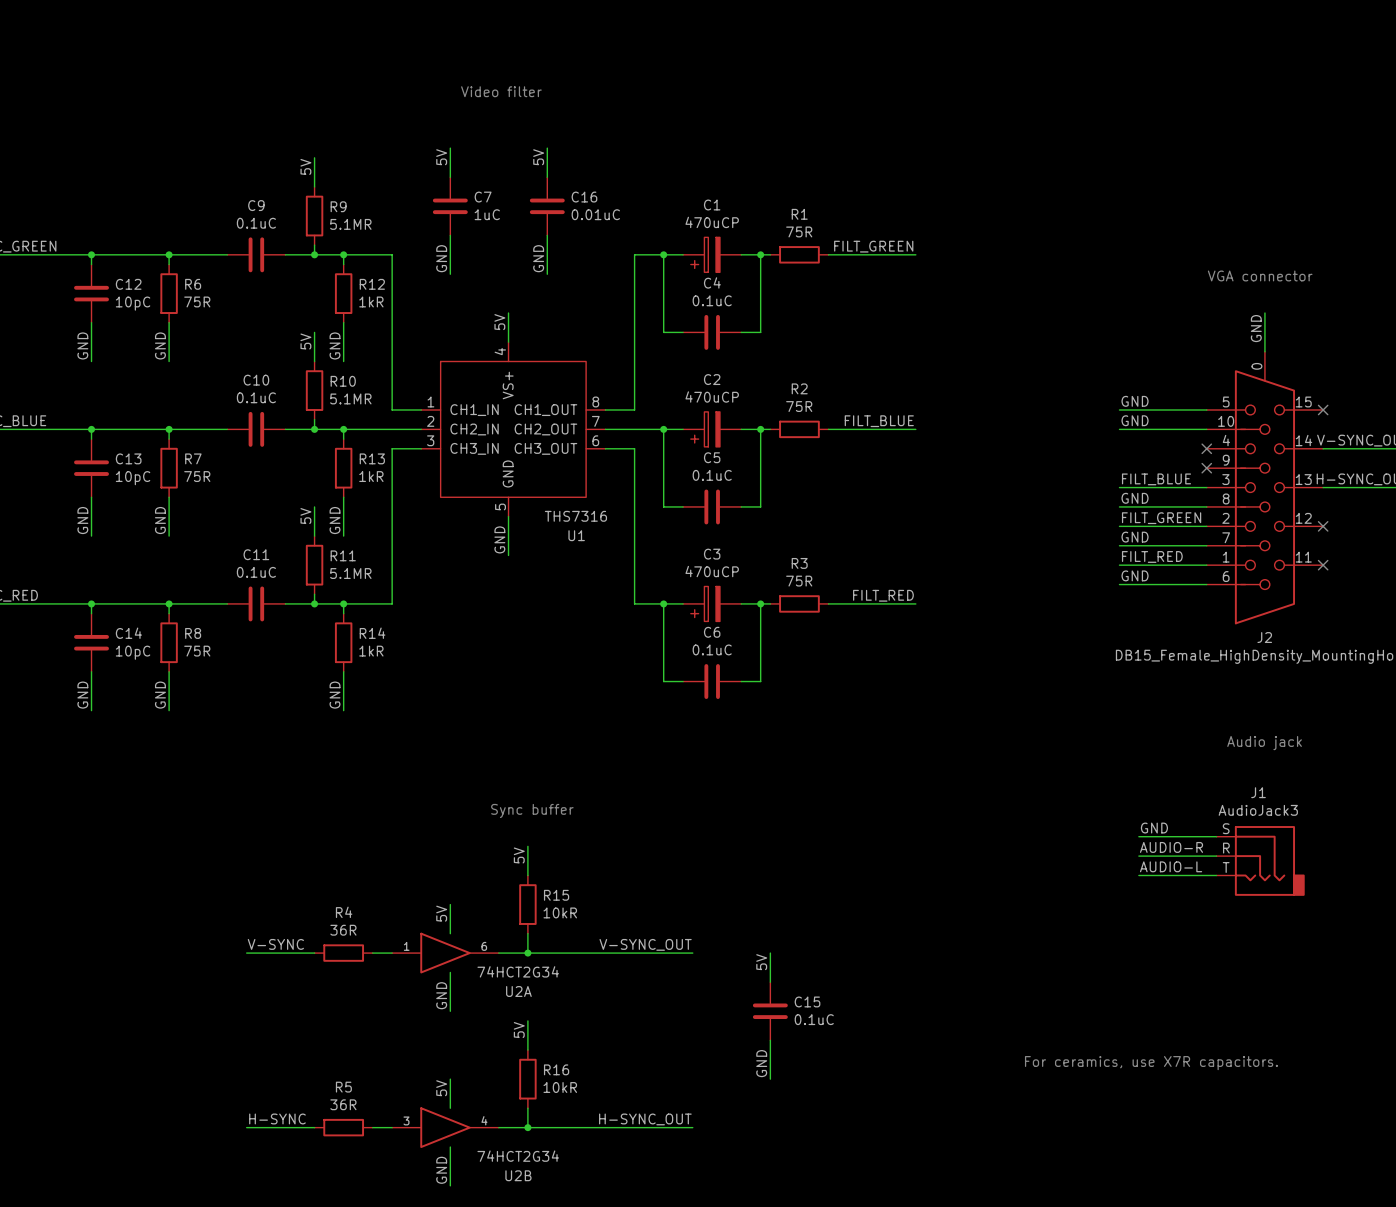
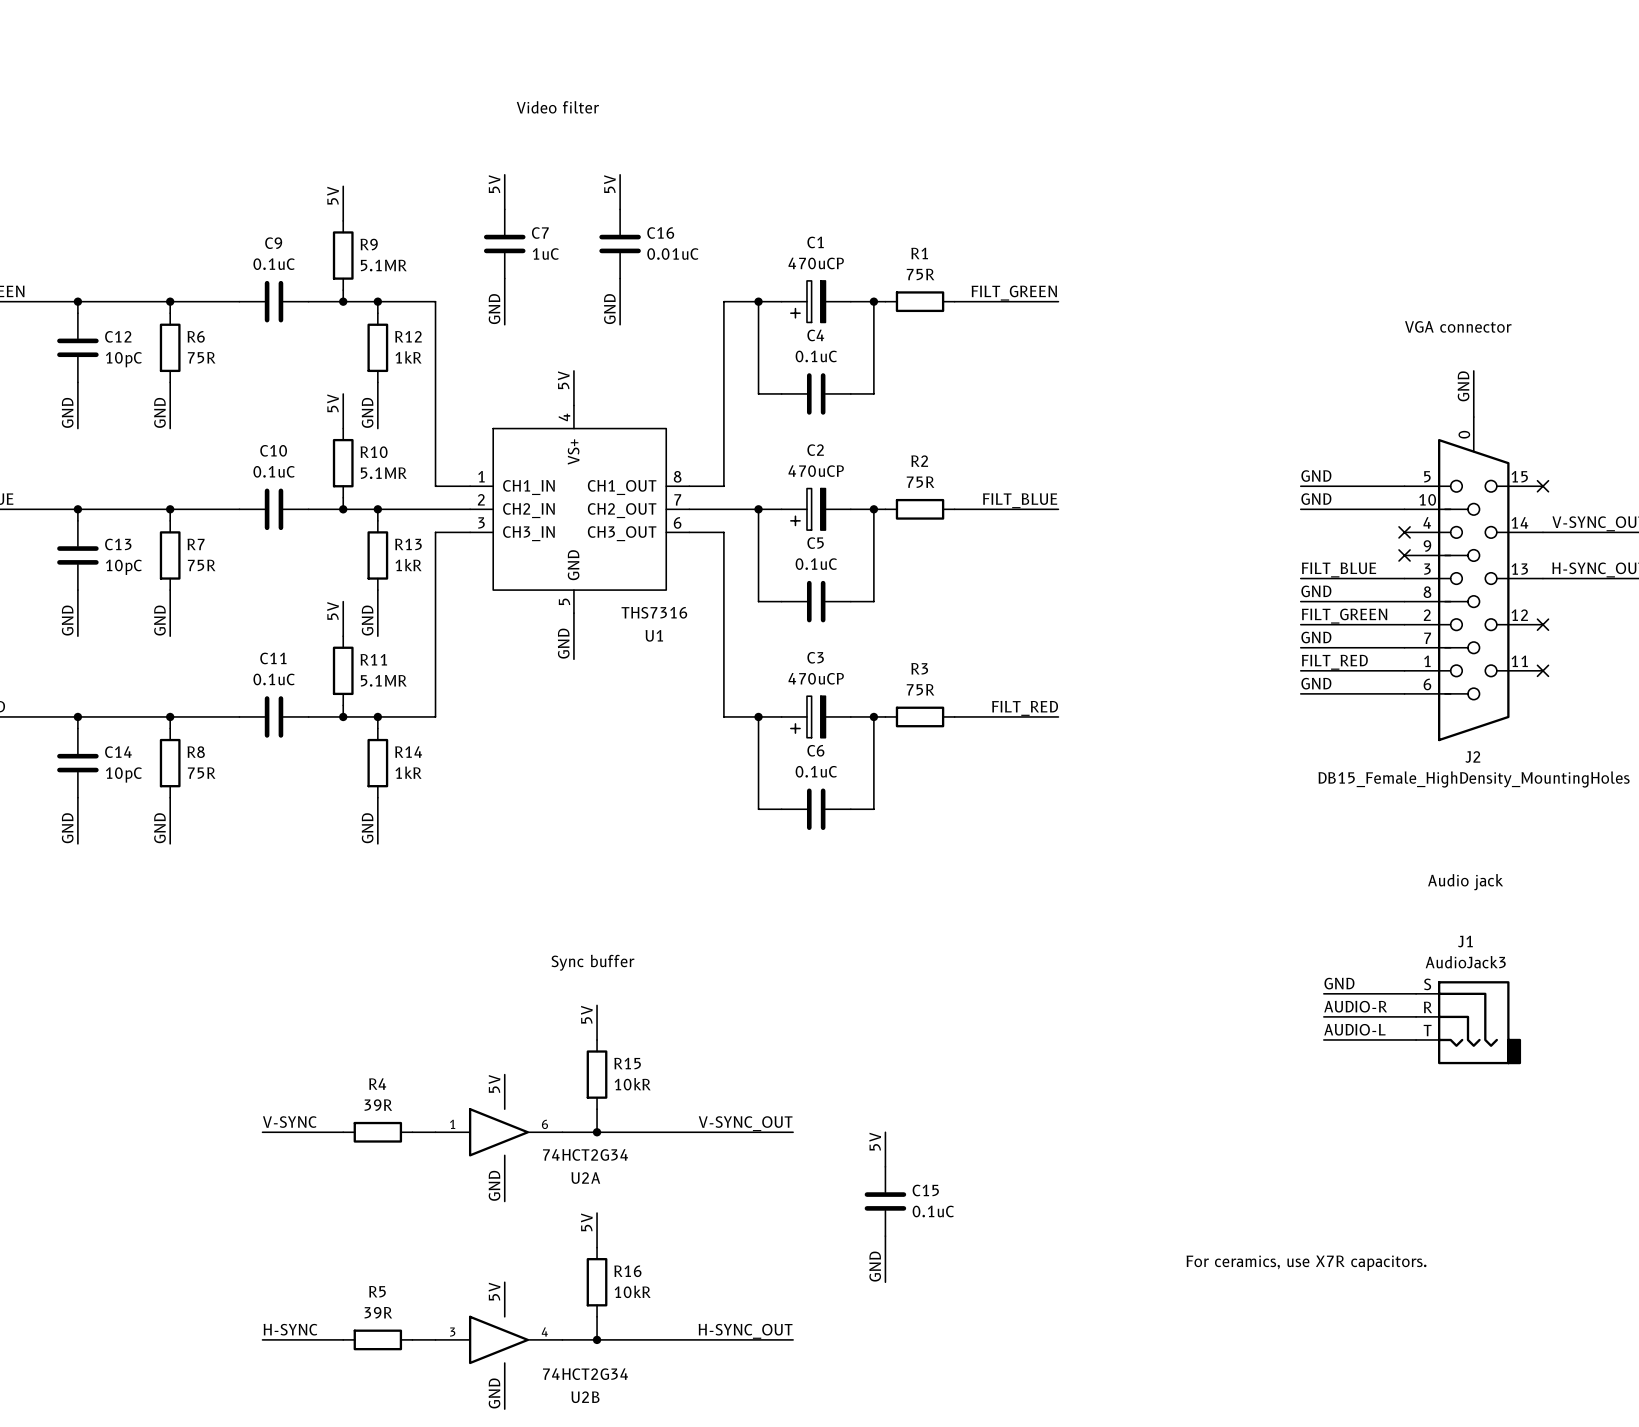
R4 value: 36R (343, 930) -> 39R (378, 1105)
R5 value: 36R (343, 1104) -> 39R (378, 1312)

